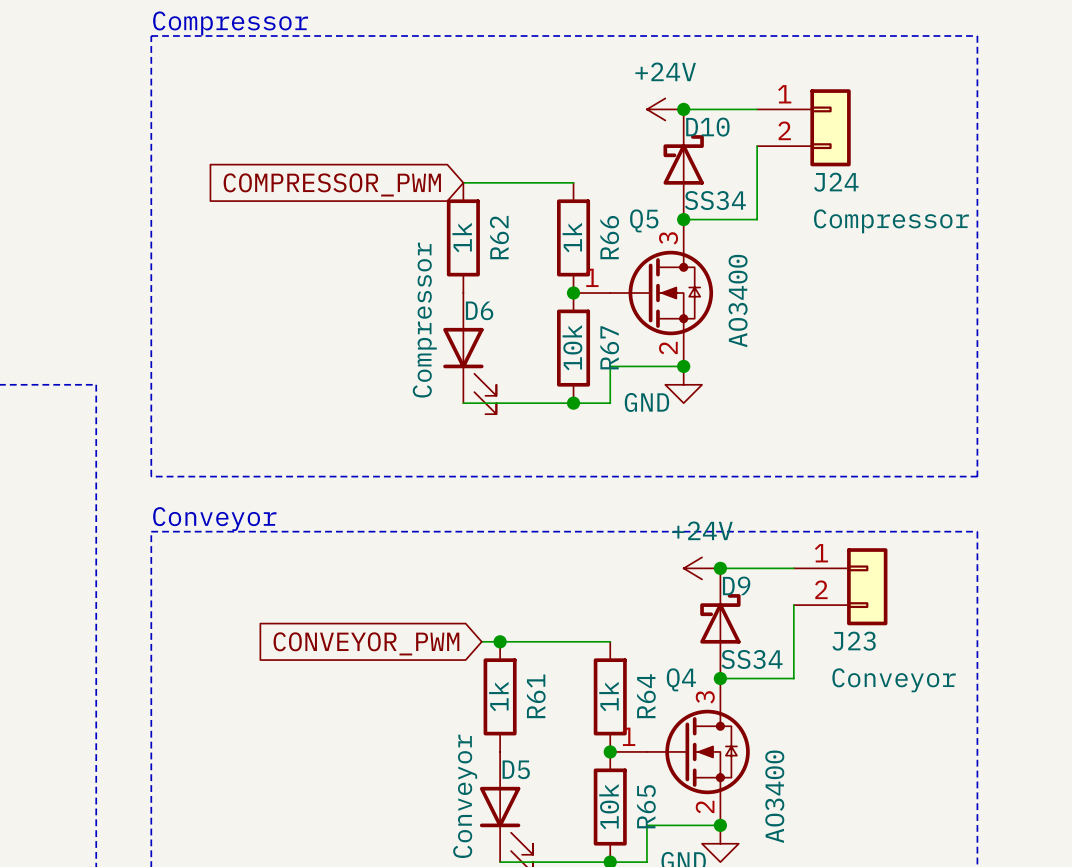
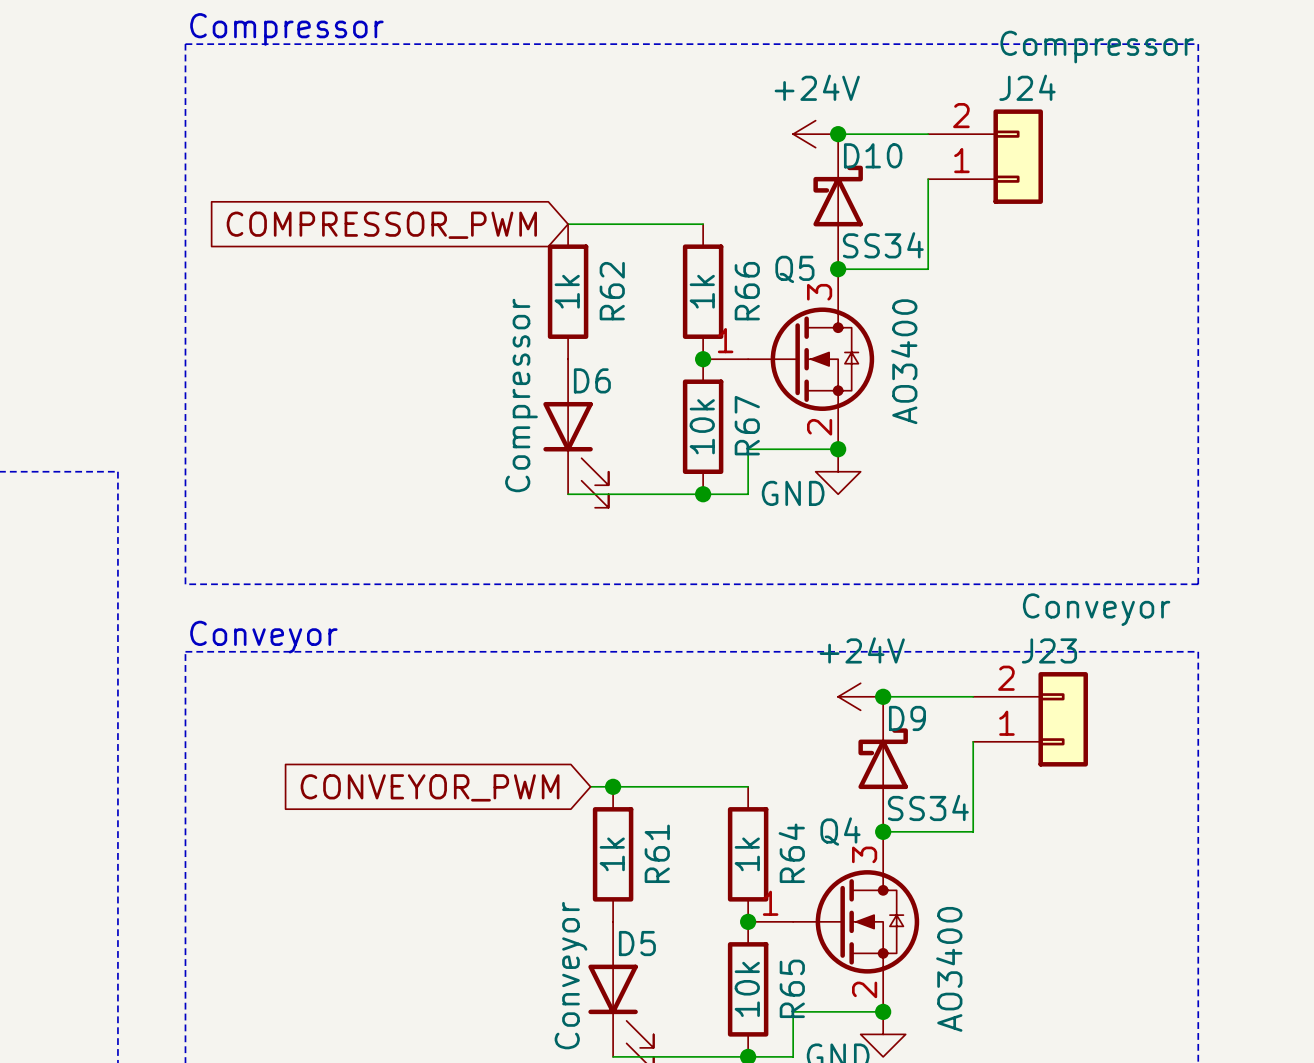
J24 flip: as is (830, 127) -> up-down (1018, 156)
J23 flip: as is (867, 586) -> up-down (1063, 719)

